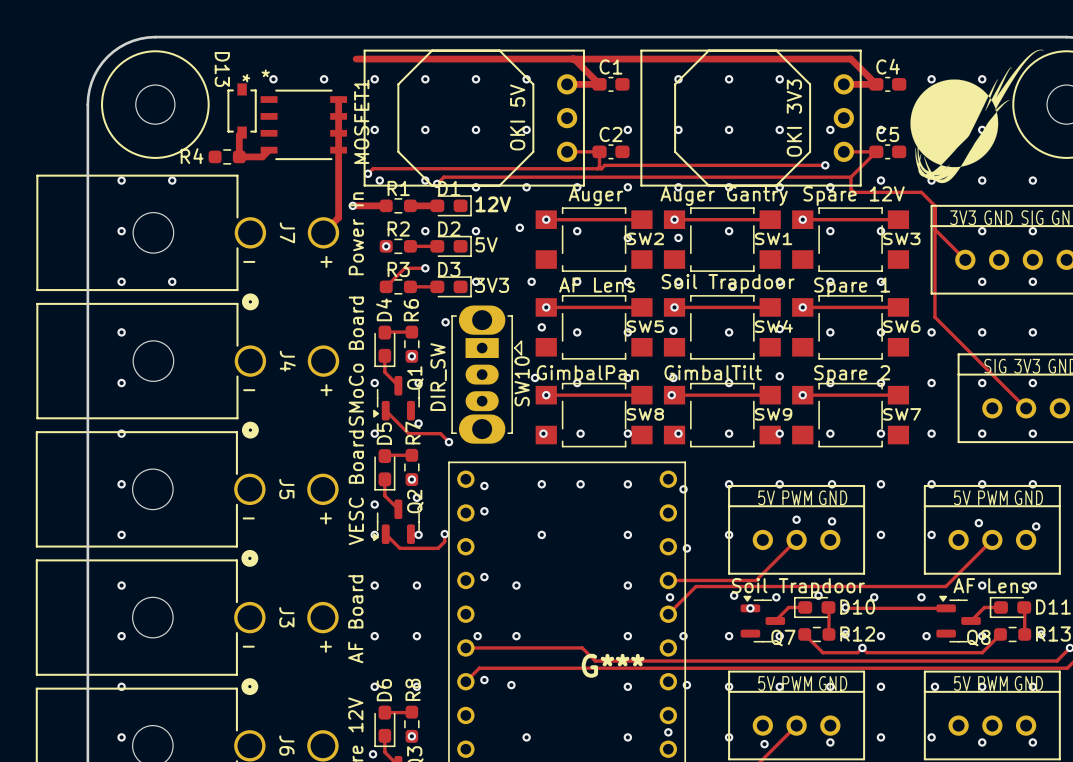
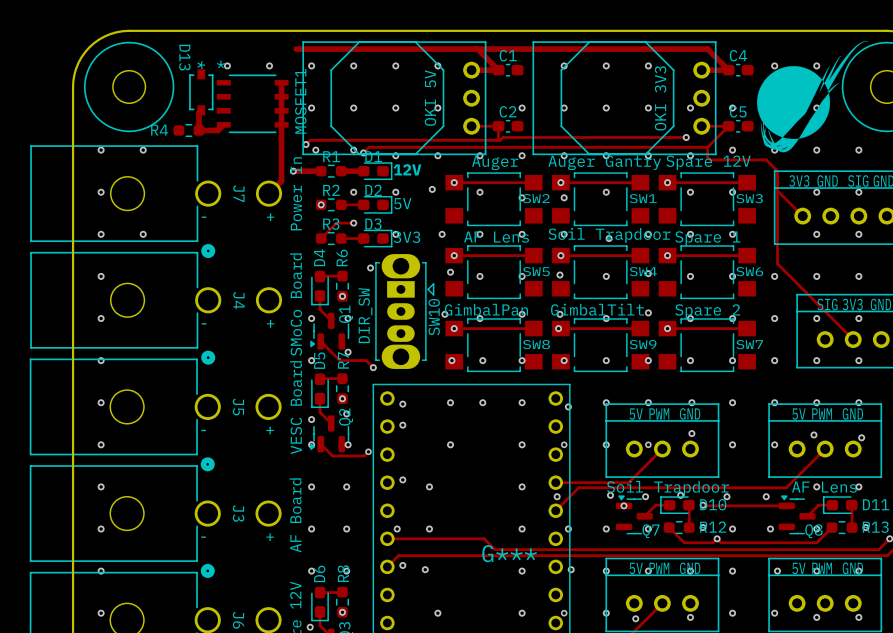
via: (796, 519) -> none
track: (444, 534) (443, 543) -> none
via: (444, 534) -> none
via: none -> (564, 444)
via: none -> (648, 444)
via: none -> (368, 451)
via: (686, 548) -> none
via: (668, 732) -> none
via: none -> (564, 613)

